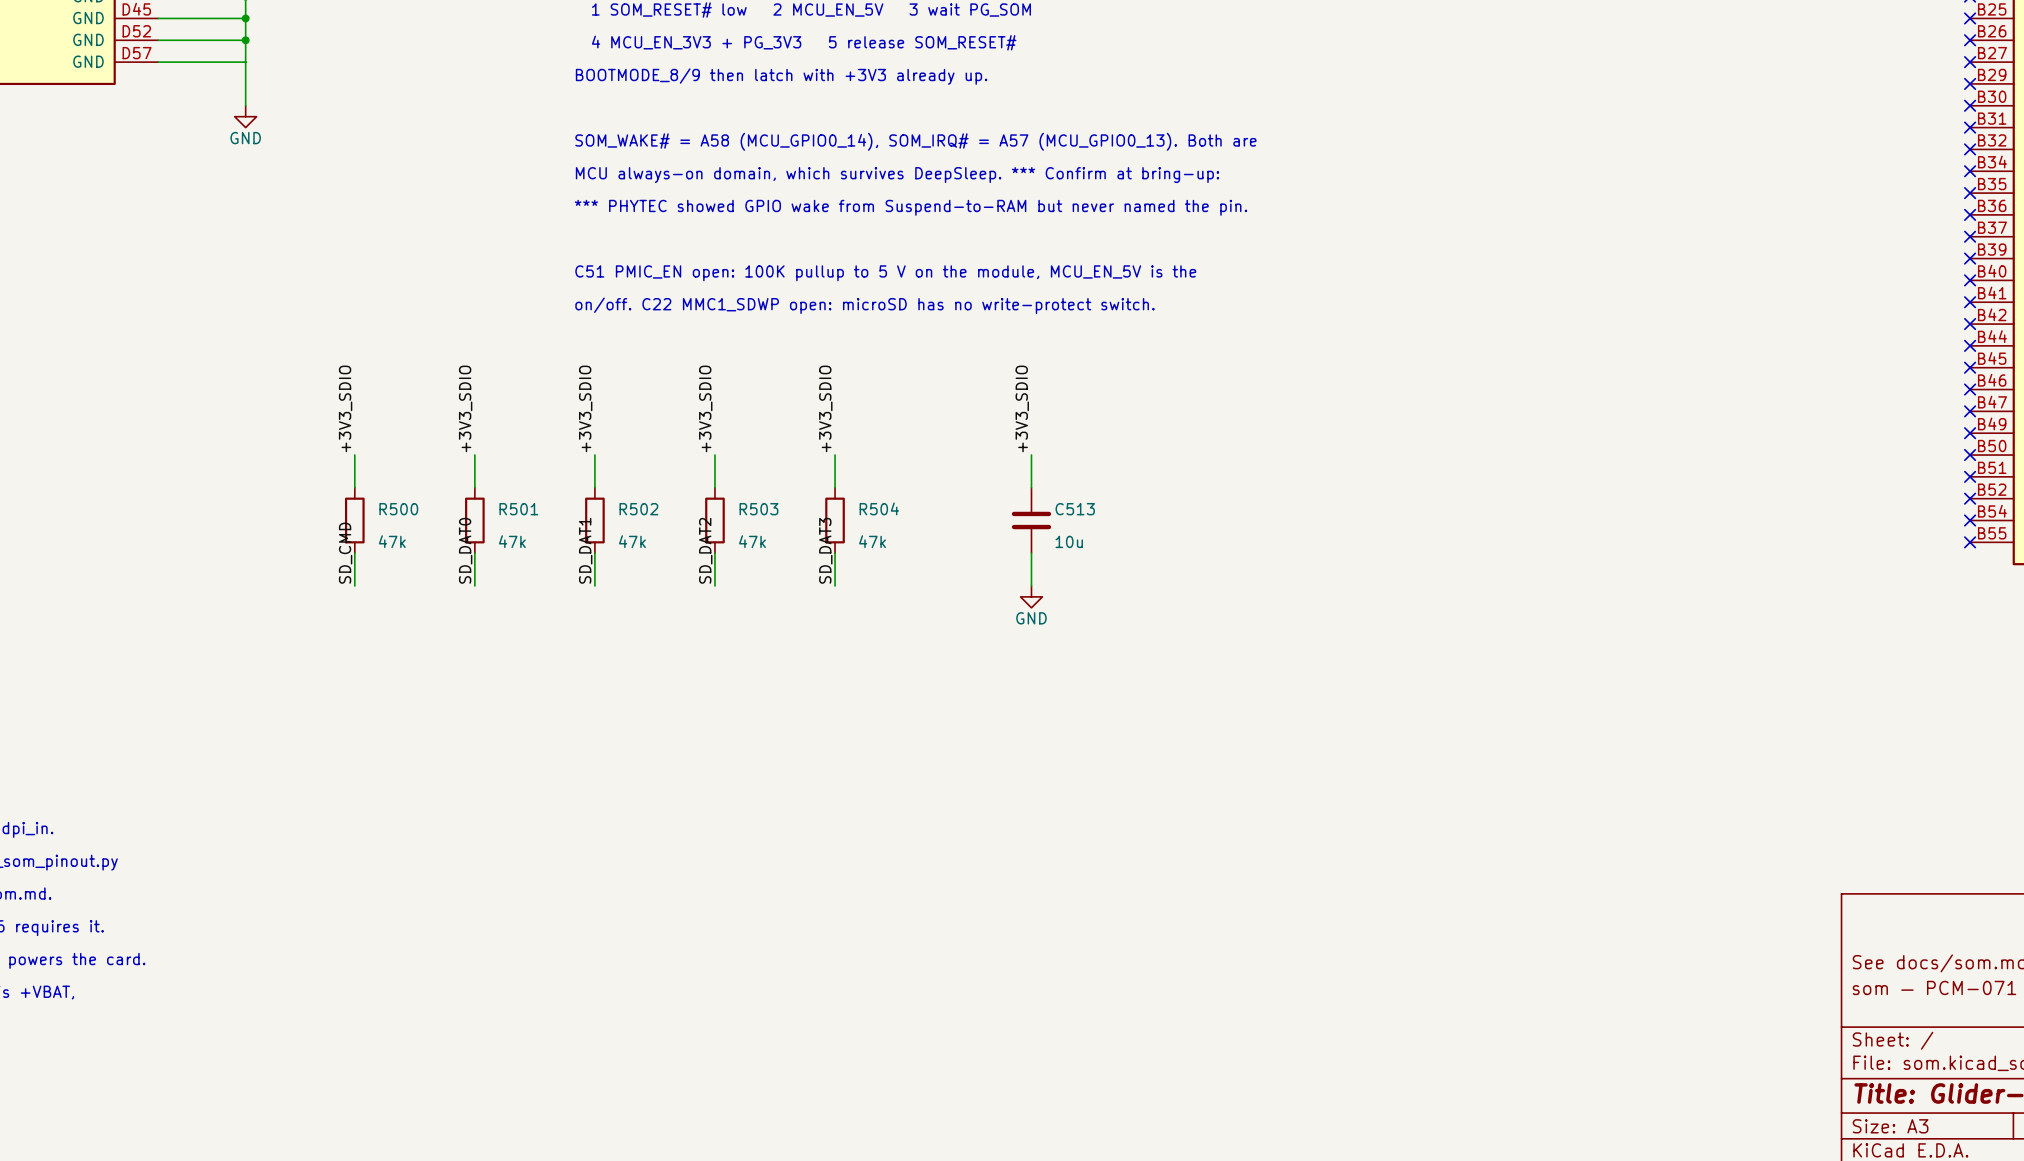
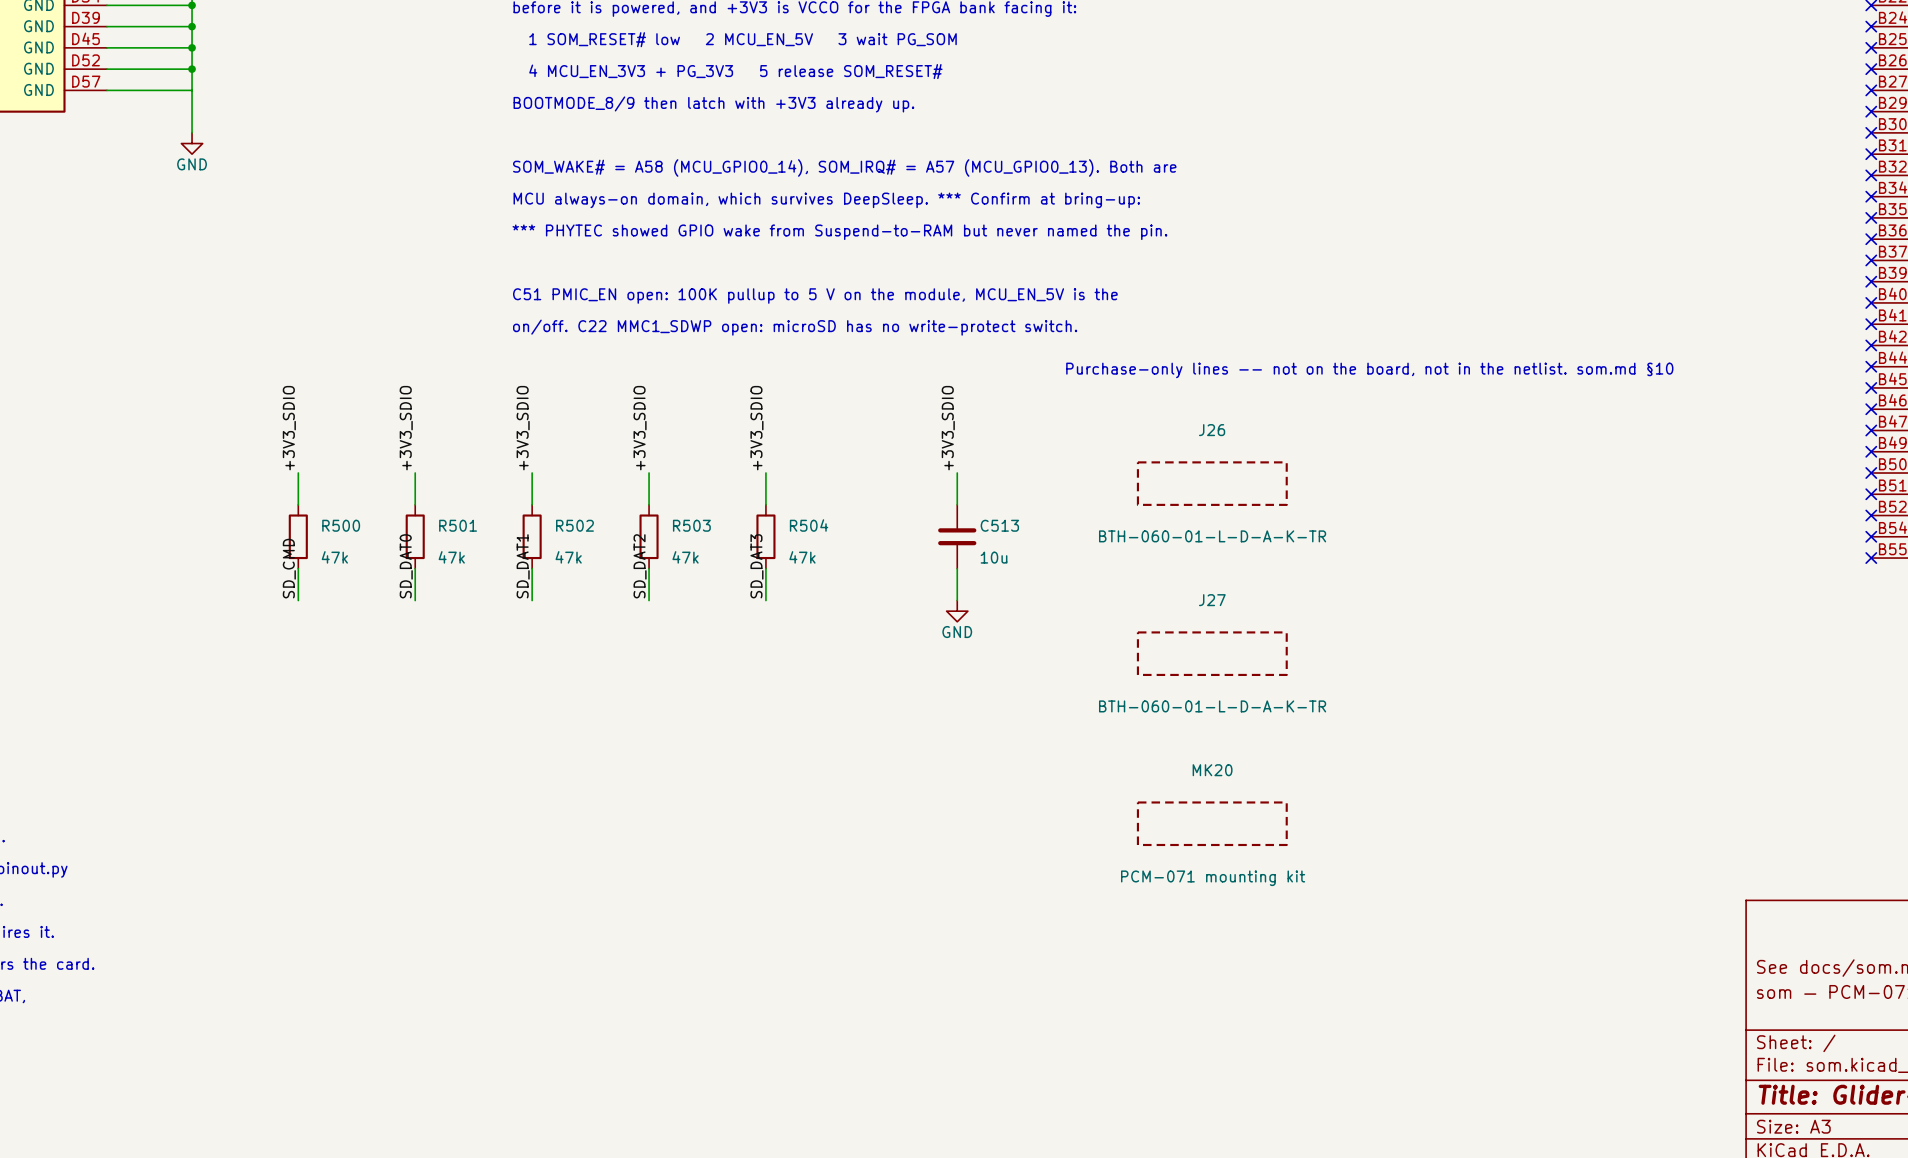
text: none -> Purchase-only lines -- not on the board, not in the netlist. som.md §10 (1369, 370)
J26: none -> BTH-060-01-L-D-A-K-TR (1212, 483)
J27: none -> BTH-060-01-L-D-A-K-TR (1212, 653)
MK20: none -> PCM-071 mounting kit (1212, 823)

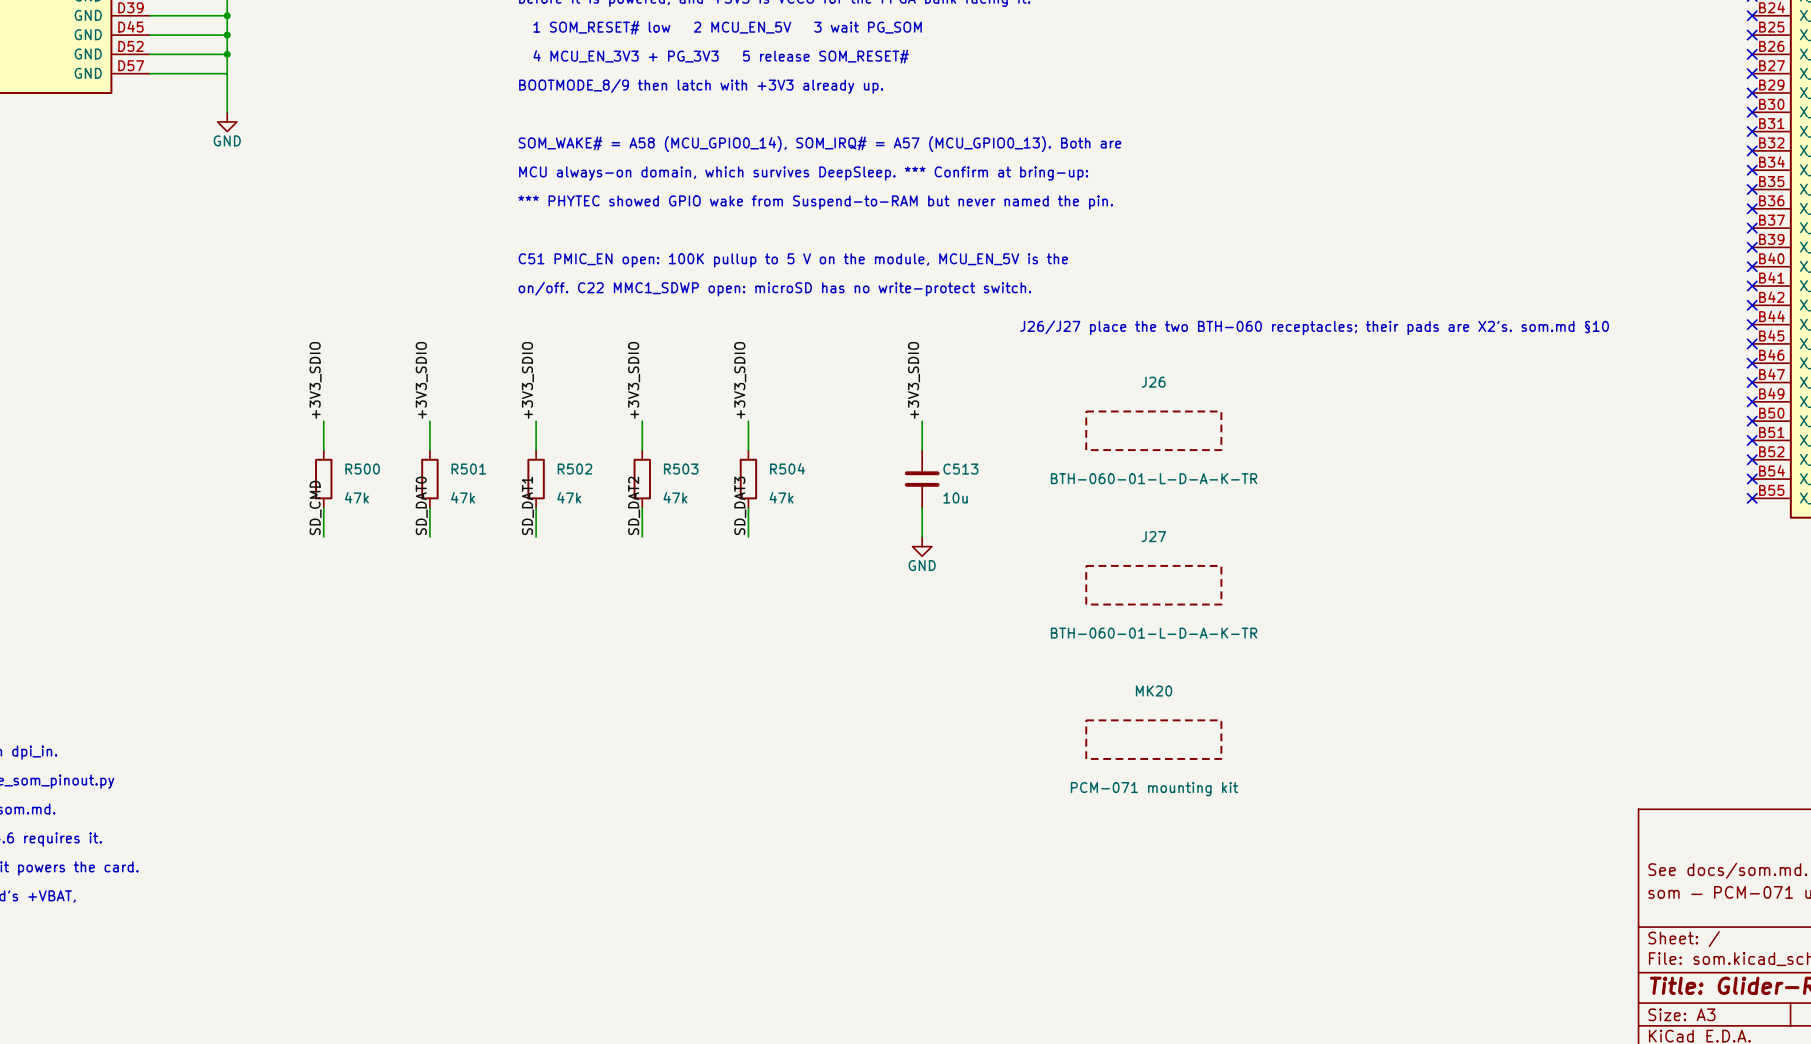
text: Purchase-only lines -- not on the board, not in the netlist. som.md §10 (1369, 370) -> J26/J27 place the two BTH-060 receptacles; their pads are X2's. som.md §10 (1314, 327)

